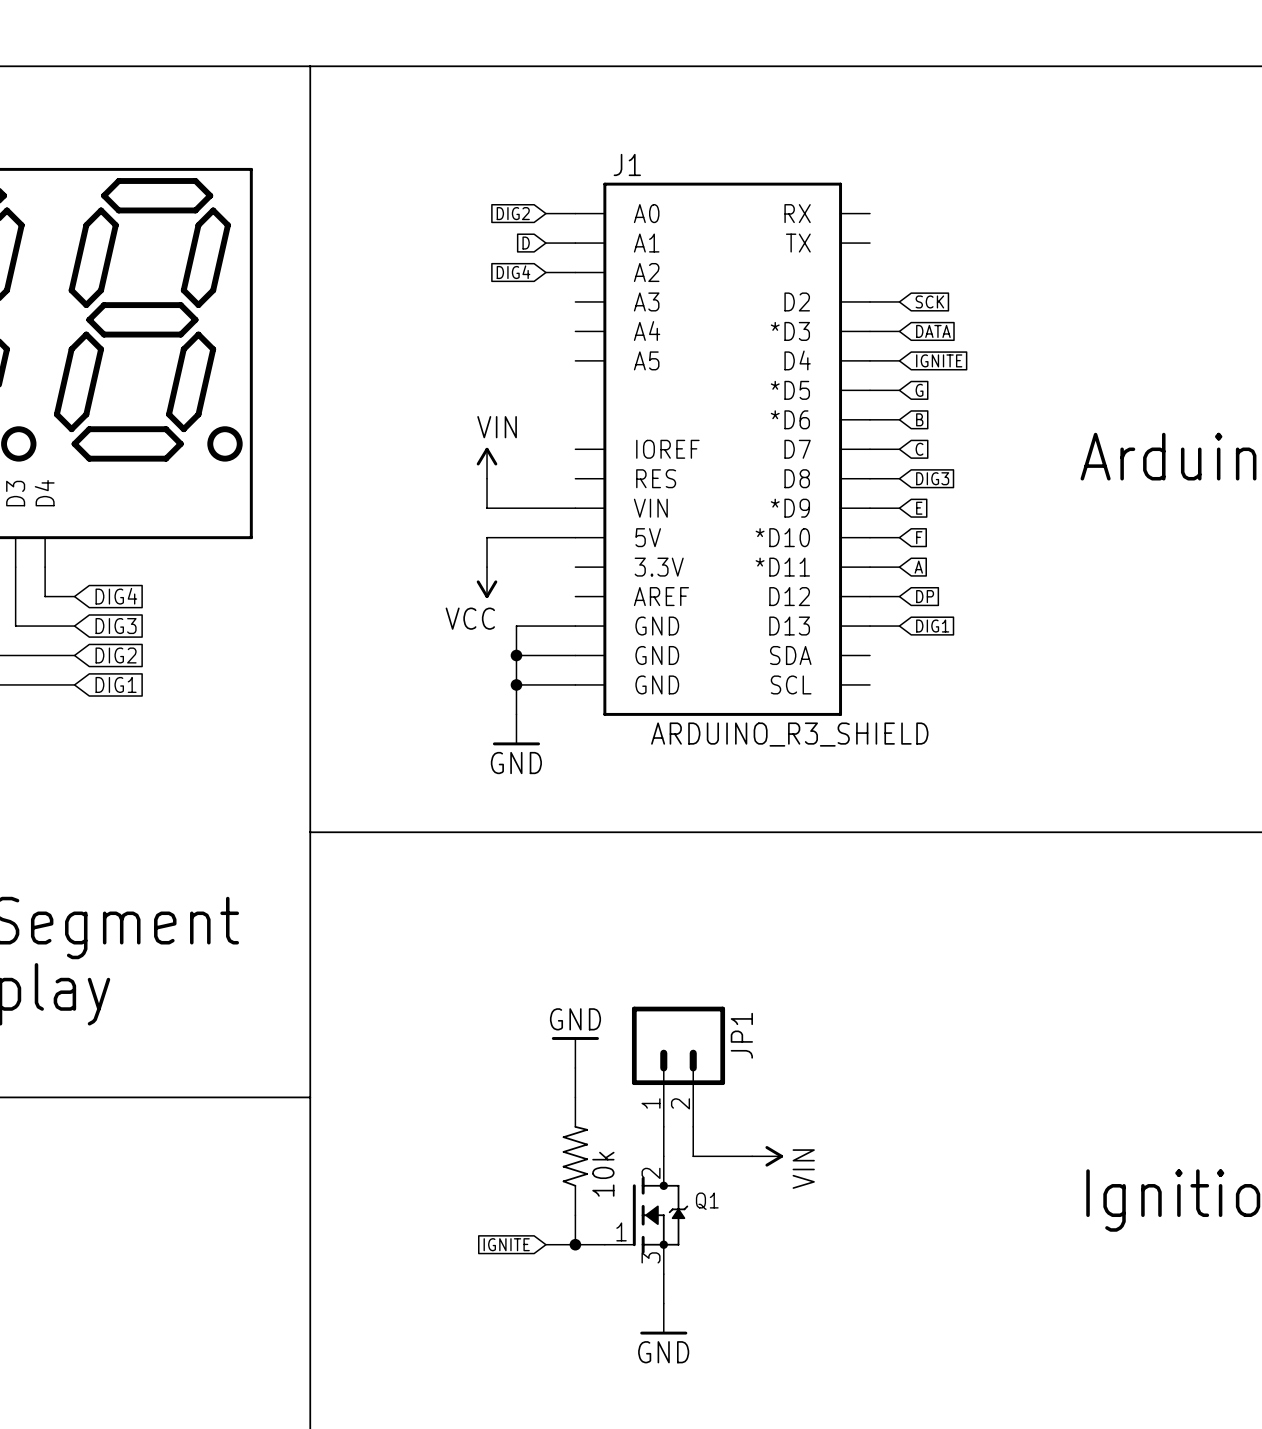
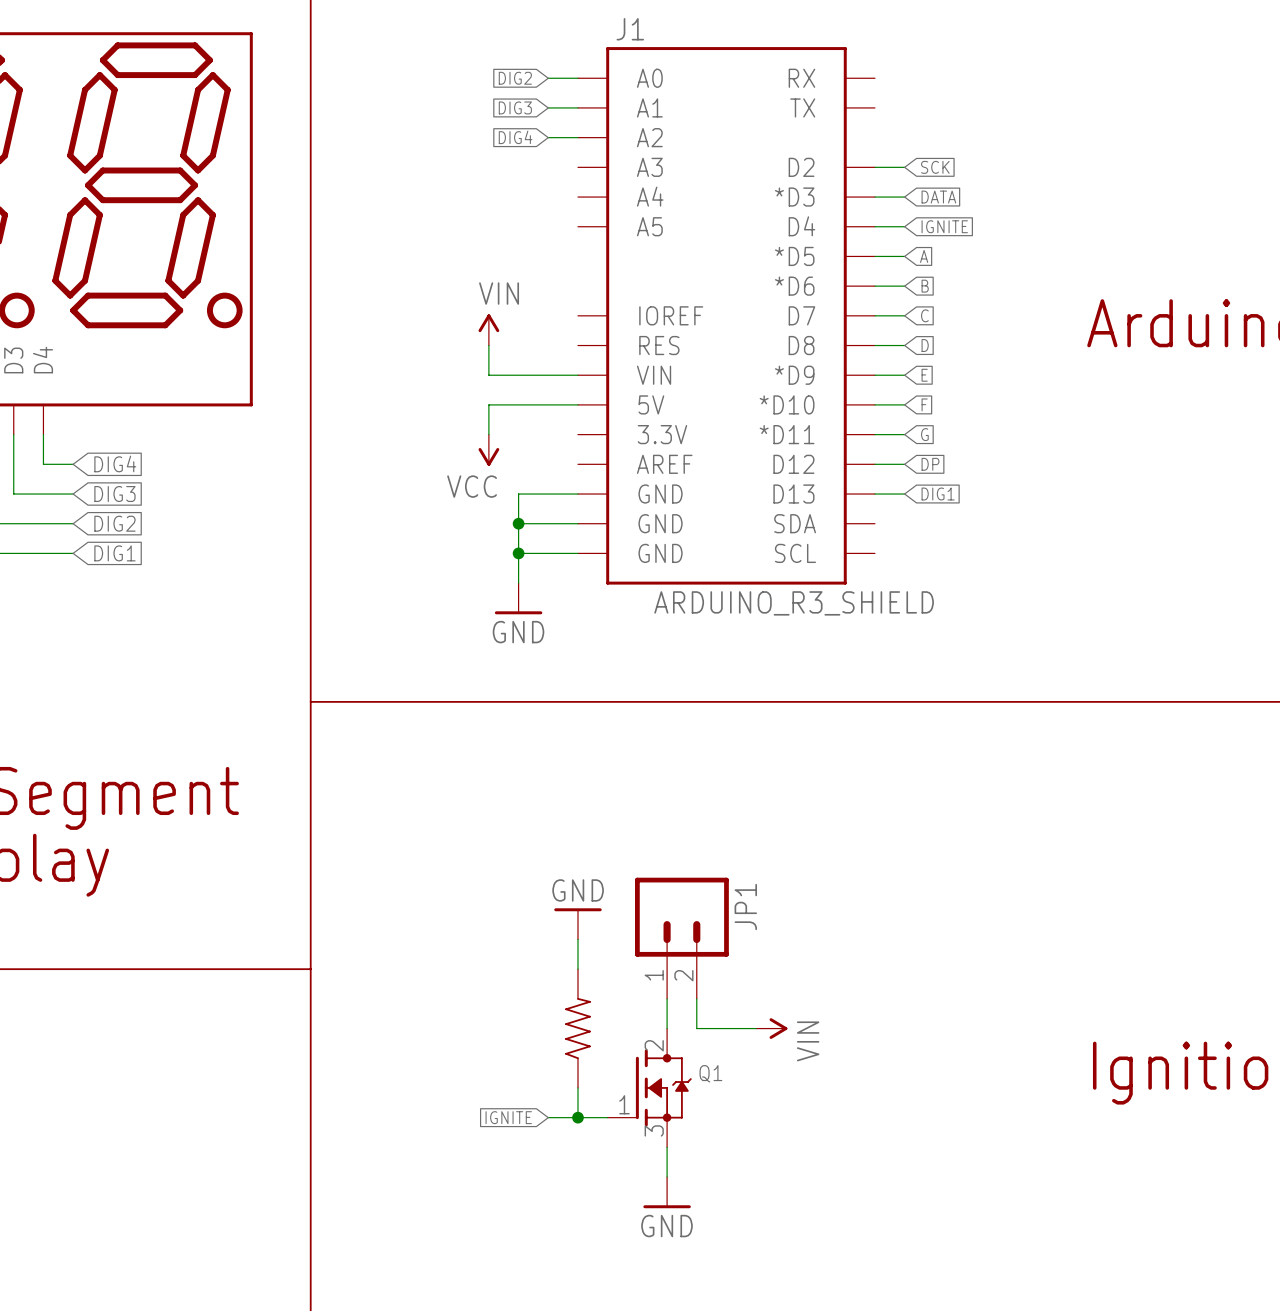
global label: D (526, 243) -> DIG3 (515, 107)
global label: G (919, 390) -> A (924, 256)
global label: DIG3 (932, 478) -> D (925, 345)
global label: A (918, 567) -> G (924, 434)
part value: 10k (603, 1174) -> none

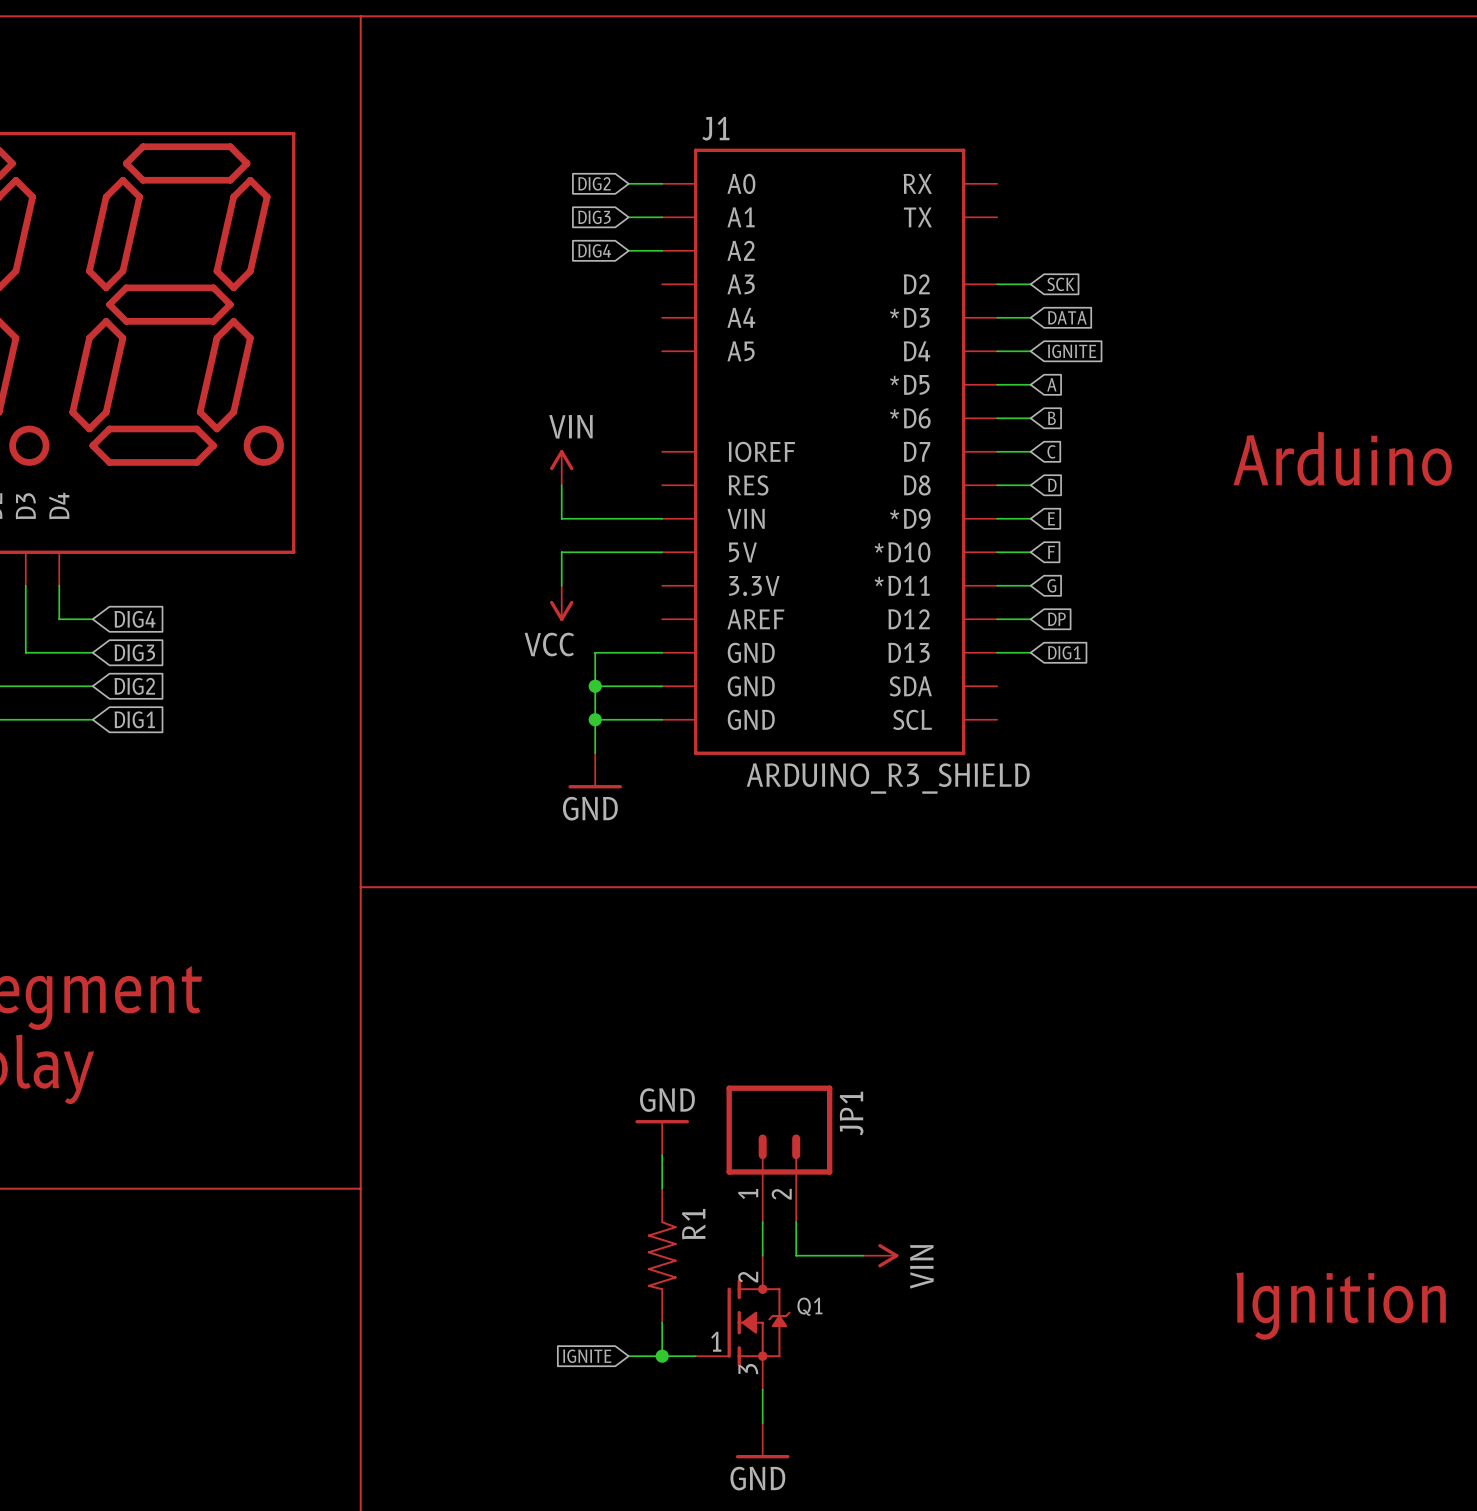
part: (577, 1028) -> none
R1: none -> (662, 1255)

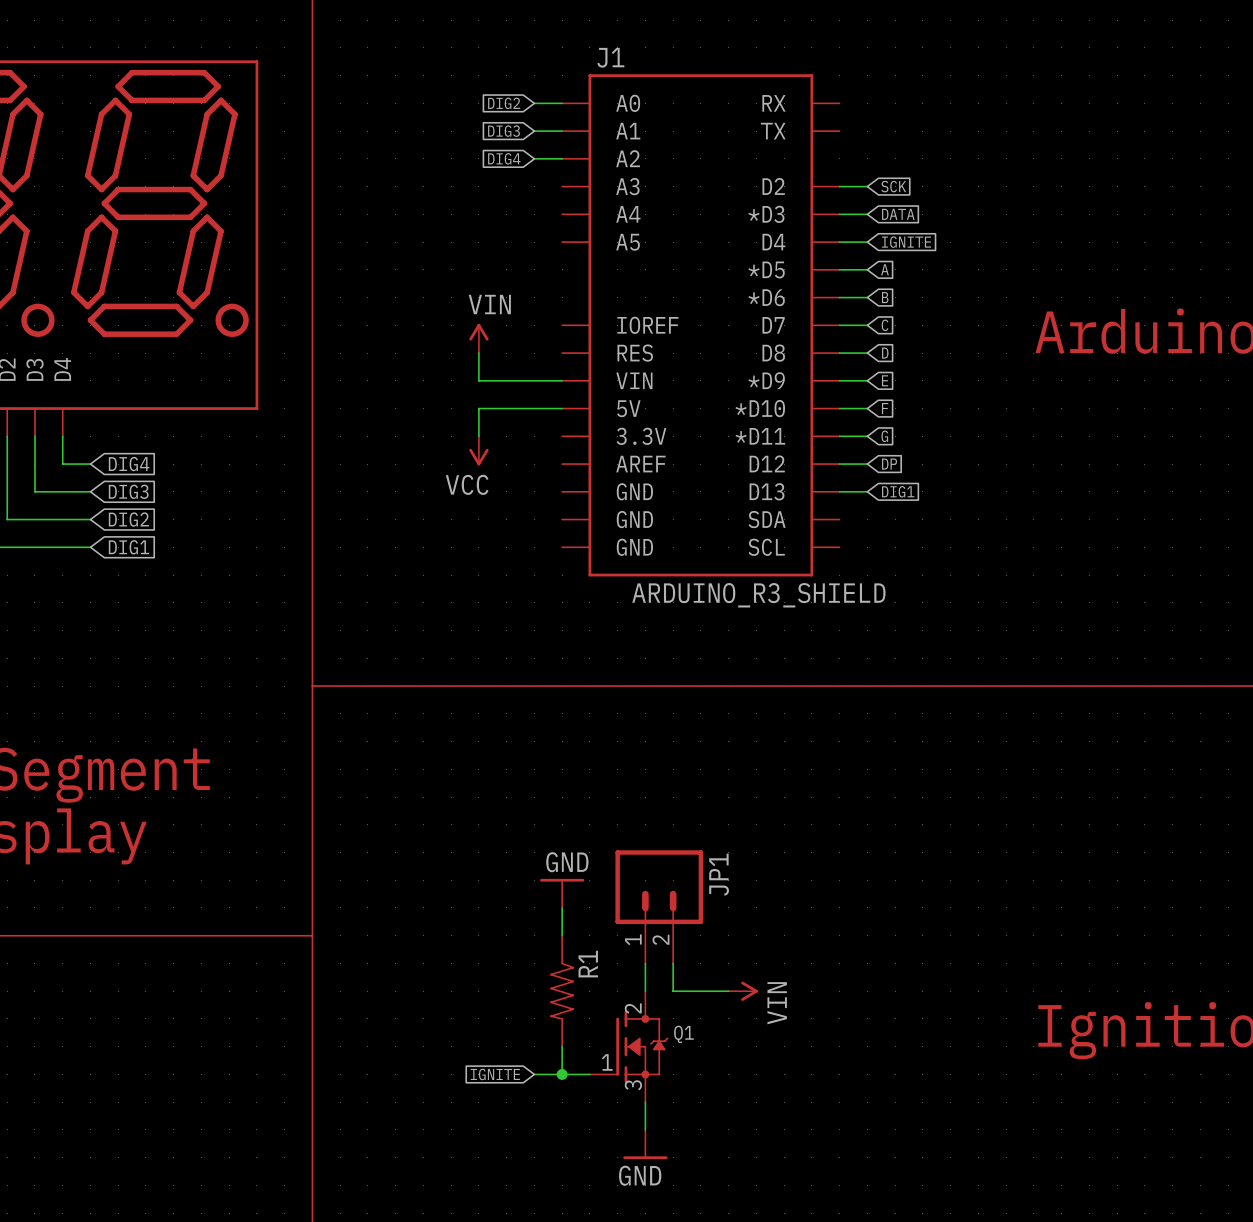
wire: (662, 652) (595, 652) (595, 753) -> none
wire: (595, 686) (662, 686) -> none
junction: (595, 686) -> none
wire: (595, 719) (662, 719) -> none
junction: (595, 719) -> none
power symbol: GND (595, 770) -> none

